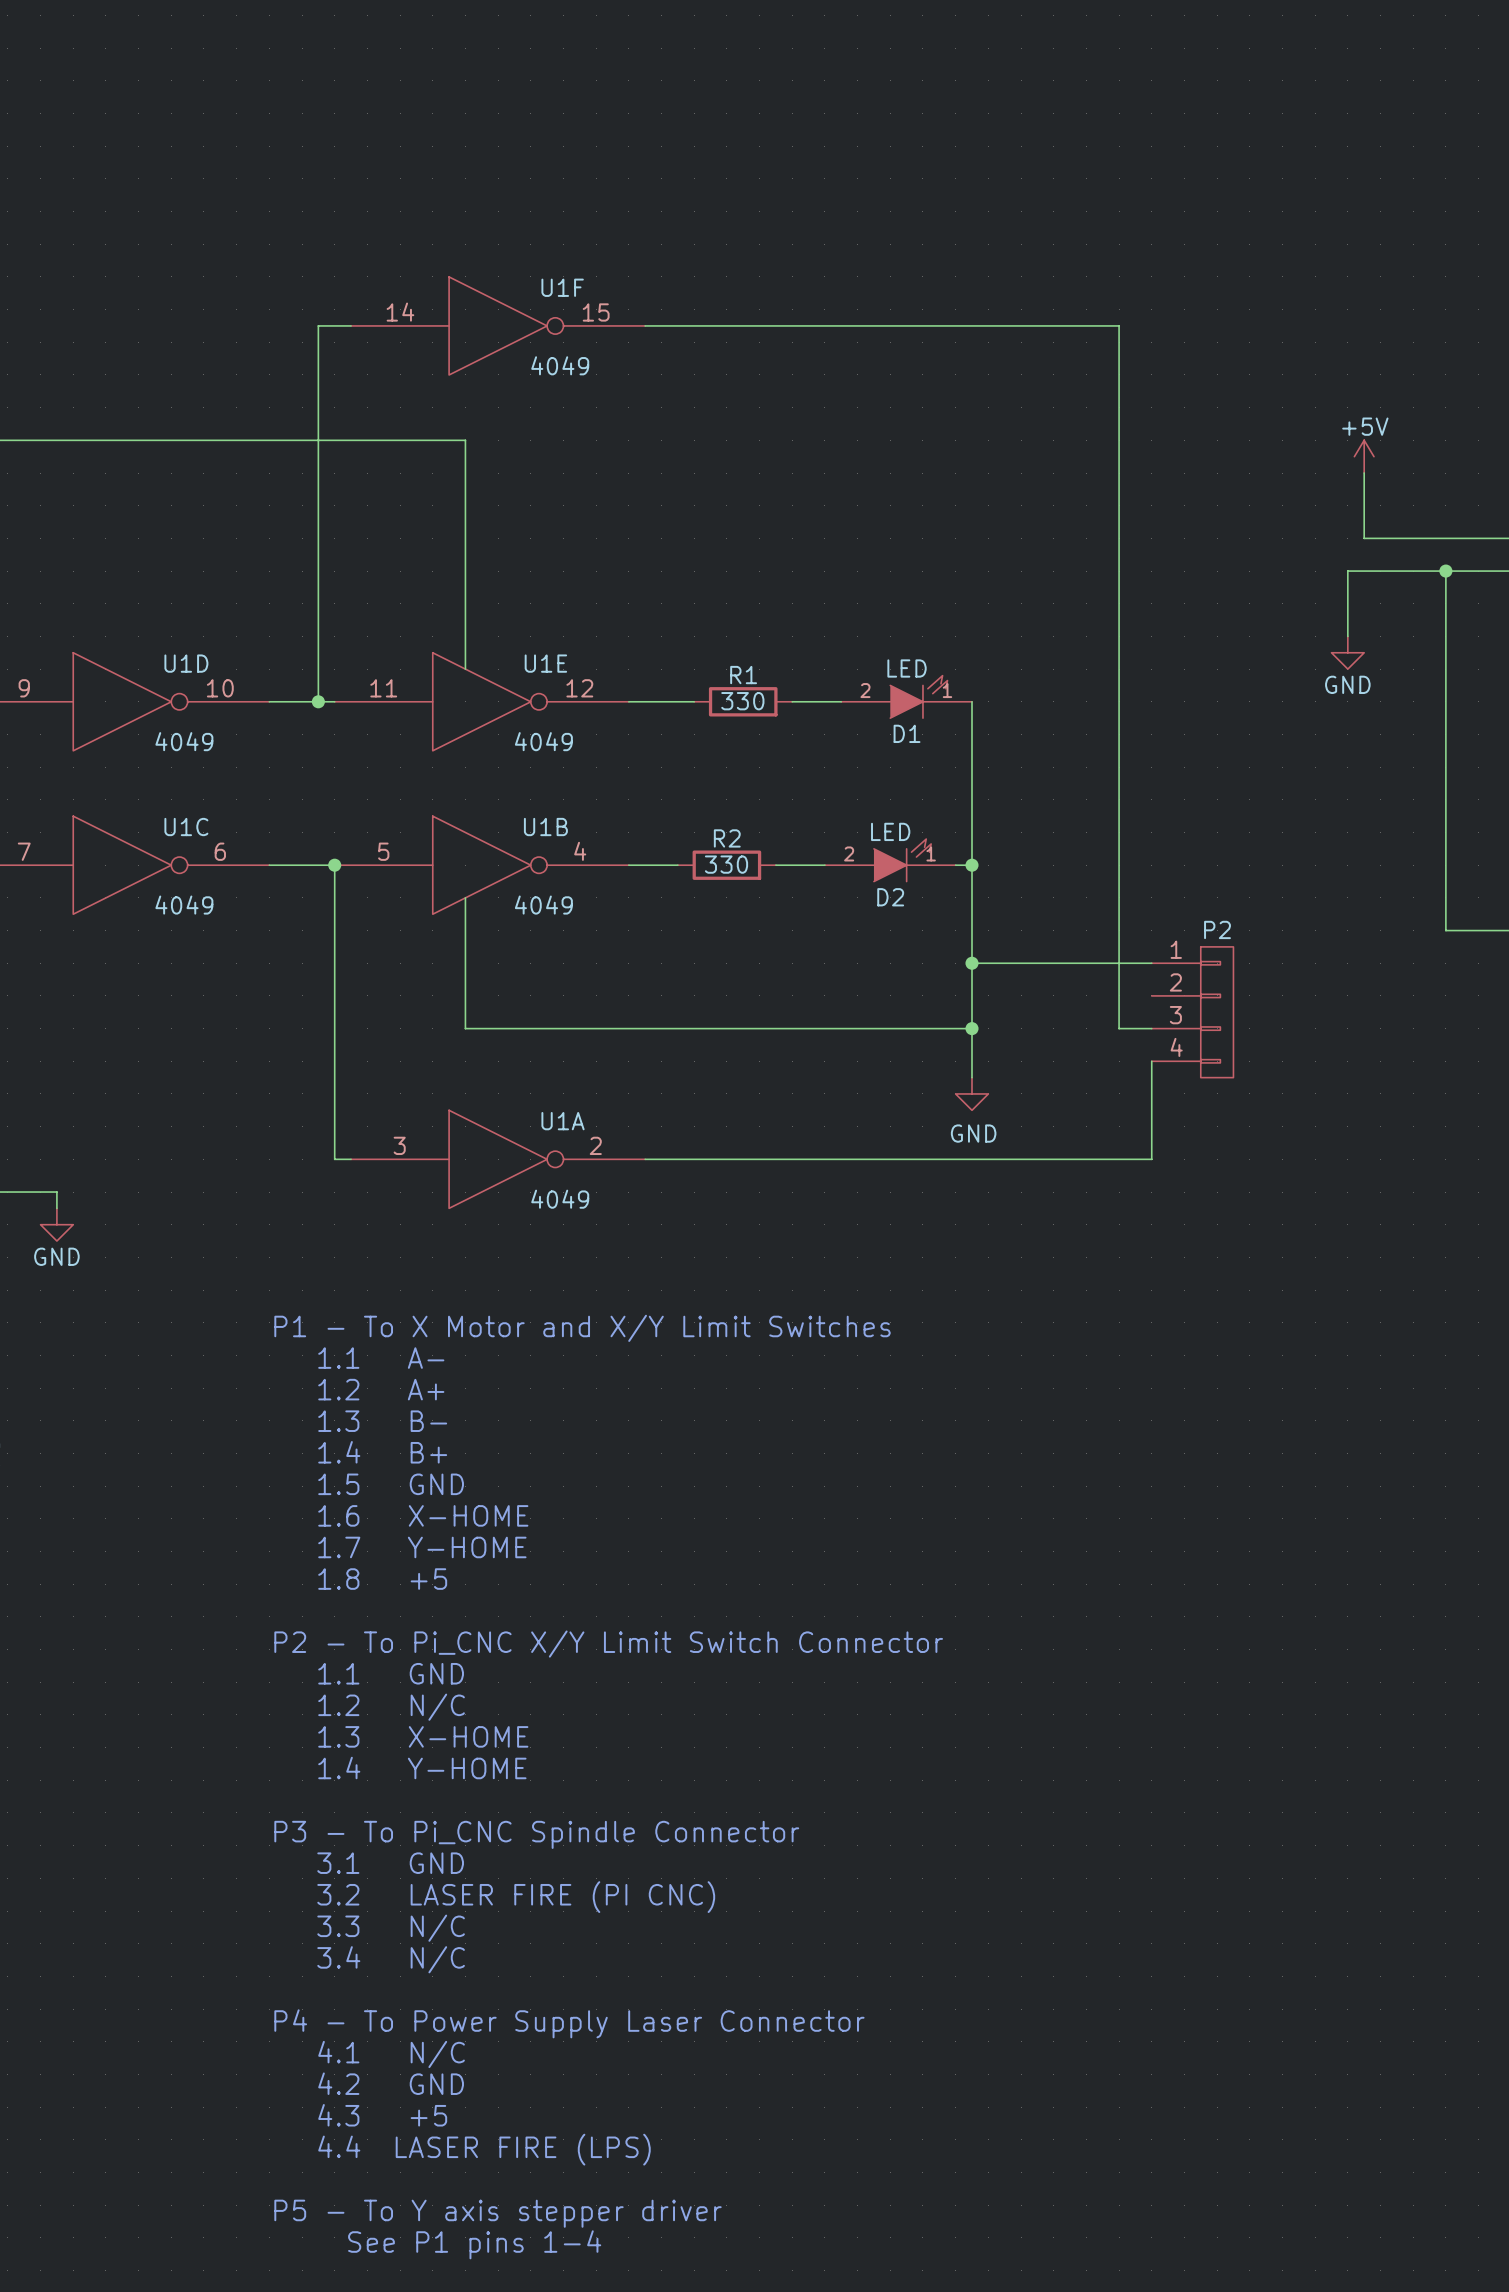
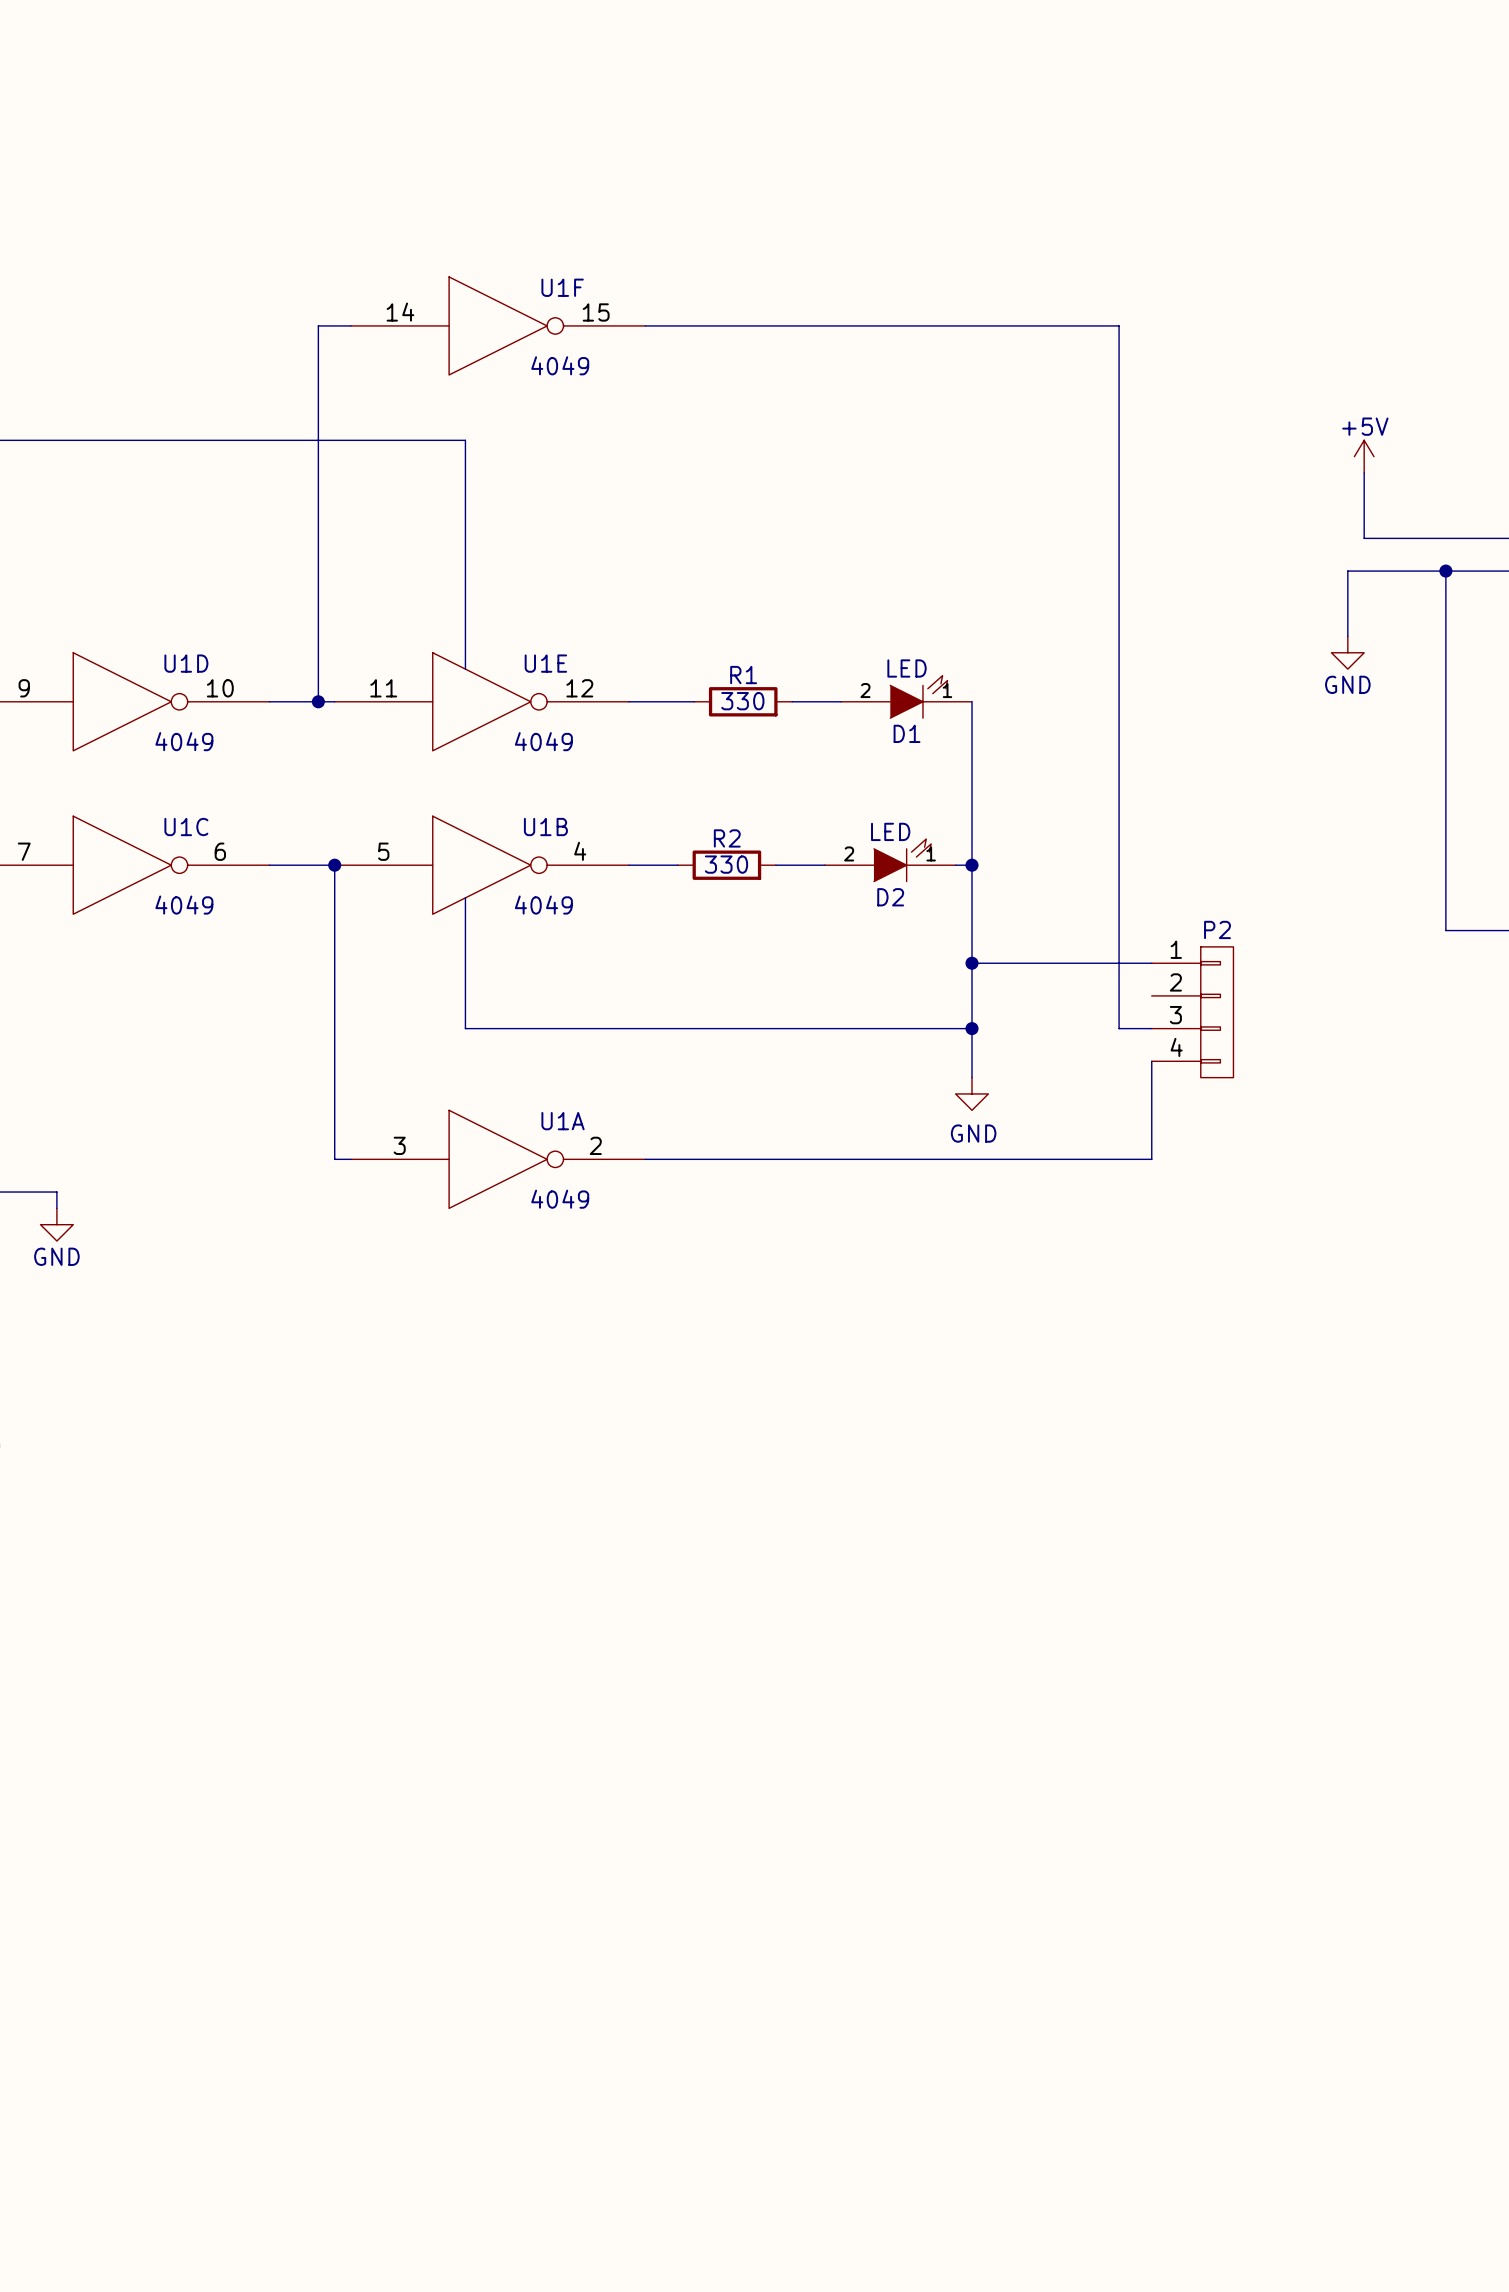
text: P1 - To X Motor and X/Y Limit Switches (582, 1328) -> none
text: 1.1 A- (381, 1358) -> none
text: 1.2 A+ (381, 1389) -> none
text: 1.3 B- (382, 1421) -> none
text: 1.4 B+ (382, 1452) -> none
text: 1.5 GND (391, 1484) -> none
text: 1.6 X-HOME (423, 1515) -> none
text: 1.7 Y-HOME (422, 1547) -> none
text: 1.8 +5 (382, 1579) -> none
text: P2 - To Pi_CNC X/Y Limit Switch Connector (608, 1644) -> none
text: 1.1 GND (391, 1673) -> none
text: 1.2 N/C (391, 1707) -> none
text: 1.3 X-HOME (423, 1736) -> none
text: 1.4 Y-HOME (422, 1767) -> none
text: P3 - To Pi_CNC Spindle Connector (536, 1834) -> none
text: 3.1 GND (390, 1863) -> none
text: 3.2 LASER FIRE (PI CNC) (516, 1897) -> none
text: 3.3 N/C (391, 1928) -> none
text: 3.4 N/C (391, 1959) -> none
text: P4 - To Power Supply Laser Connector (569, 2023) -> none
text: 4.1 N/C (391, 2054) -> none
text: 4.2 GND (391, 2083) -> none
text: 4.3 +5 (382, 2115) -> none
text: 4.4 LASER FIRE (LPS) (484, 2149) -> none
text: P5 - To Y axis stepper driver (498, 2213) -> none
text: See P1 pins 1-4 (474, 2244) -> none

